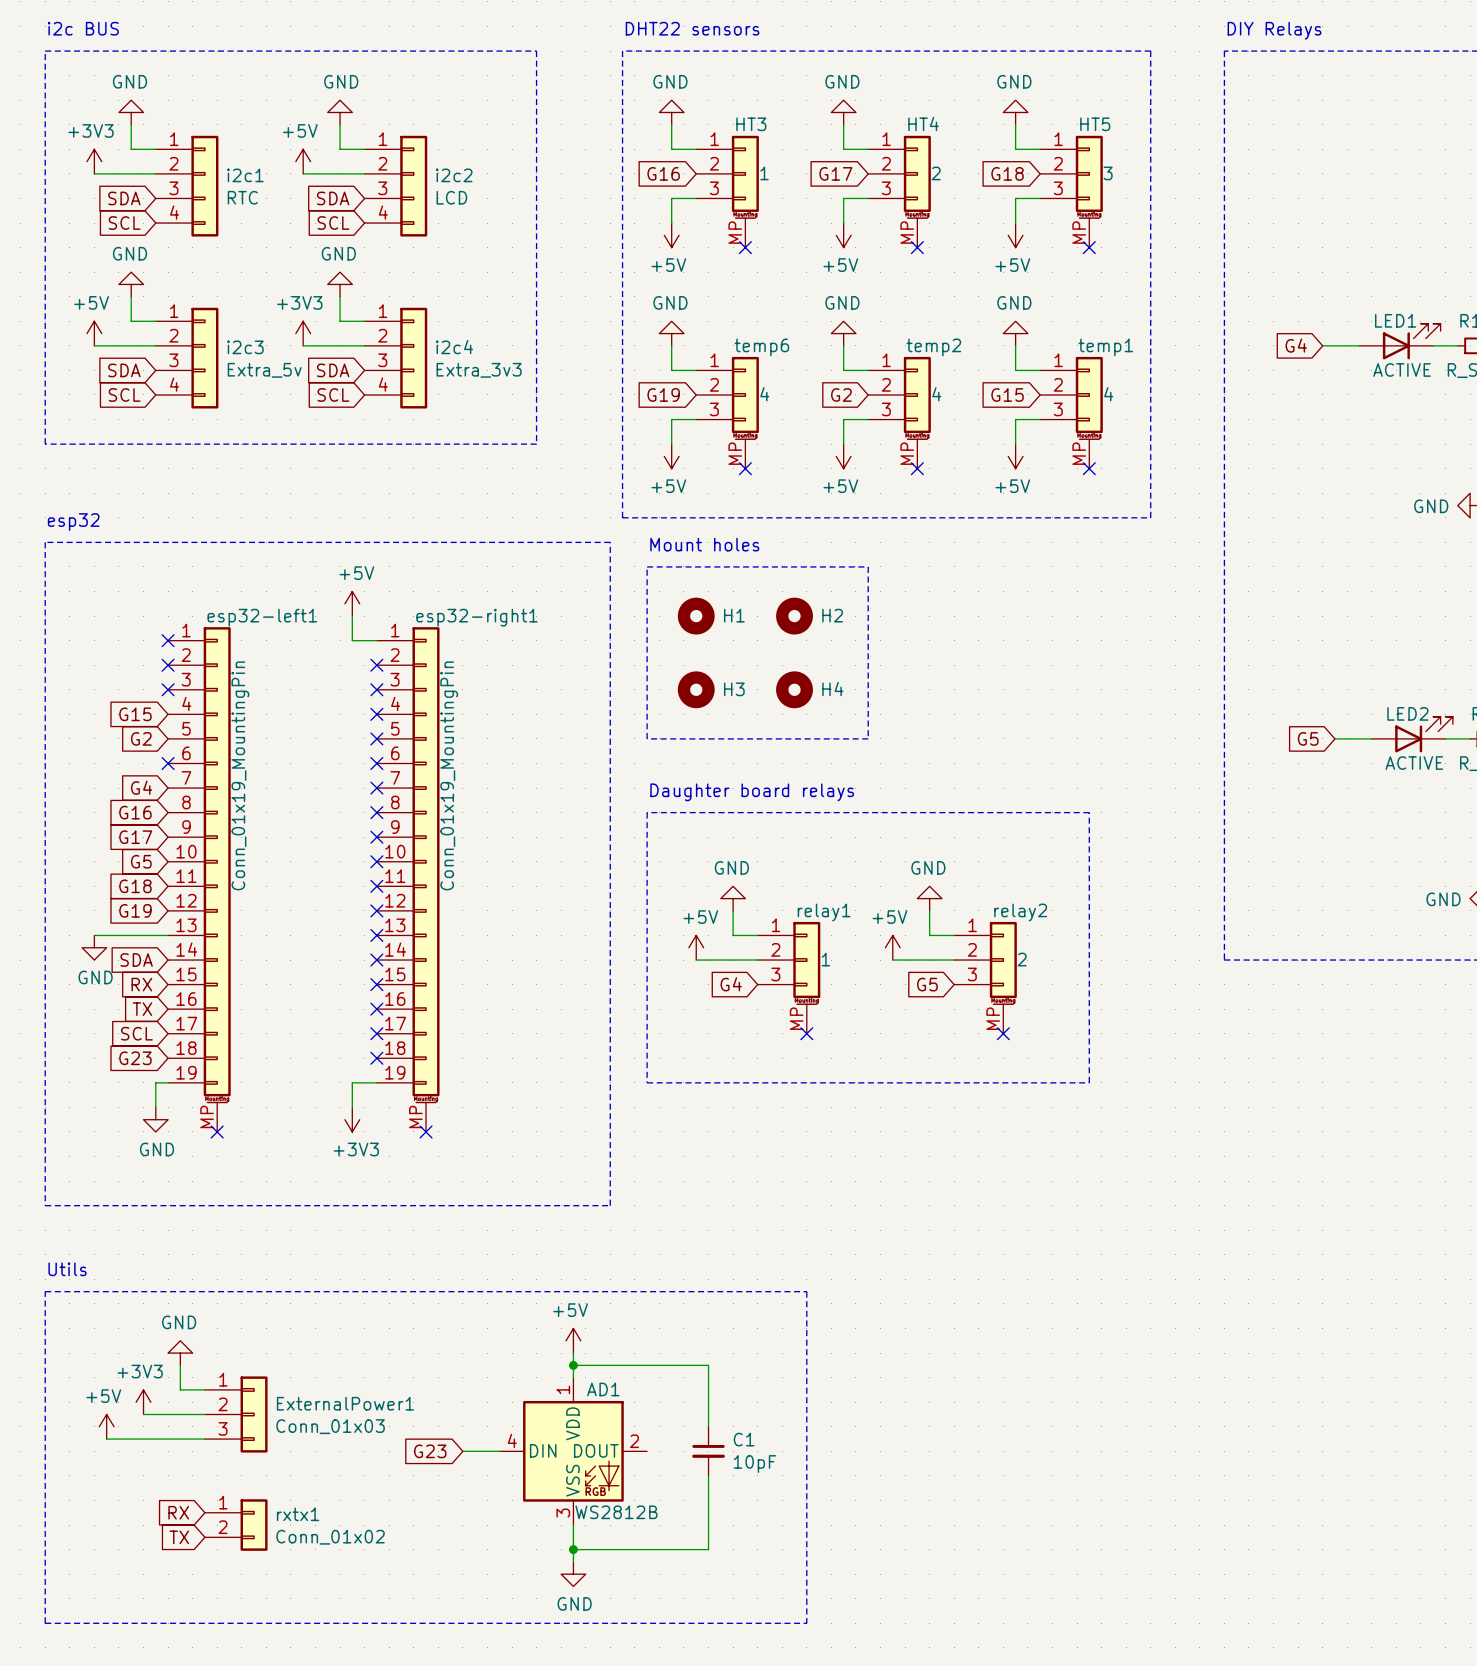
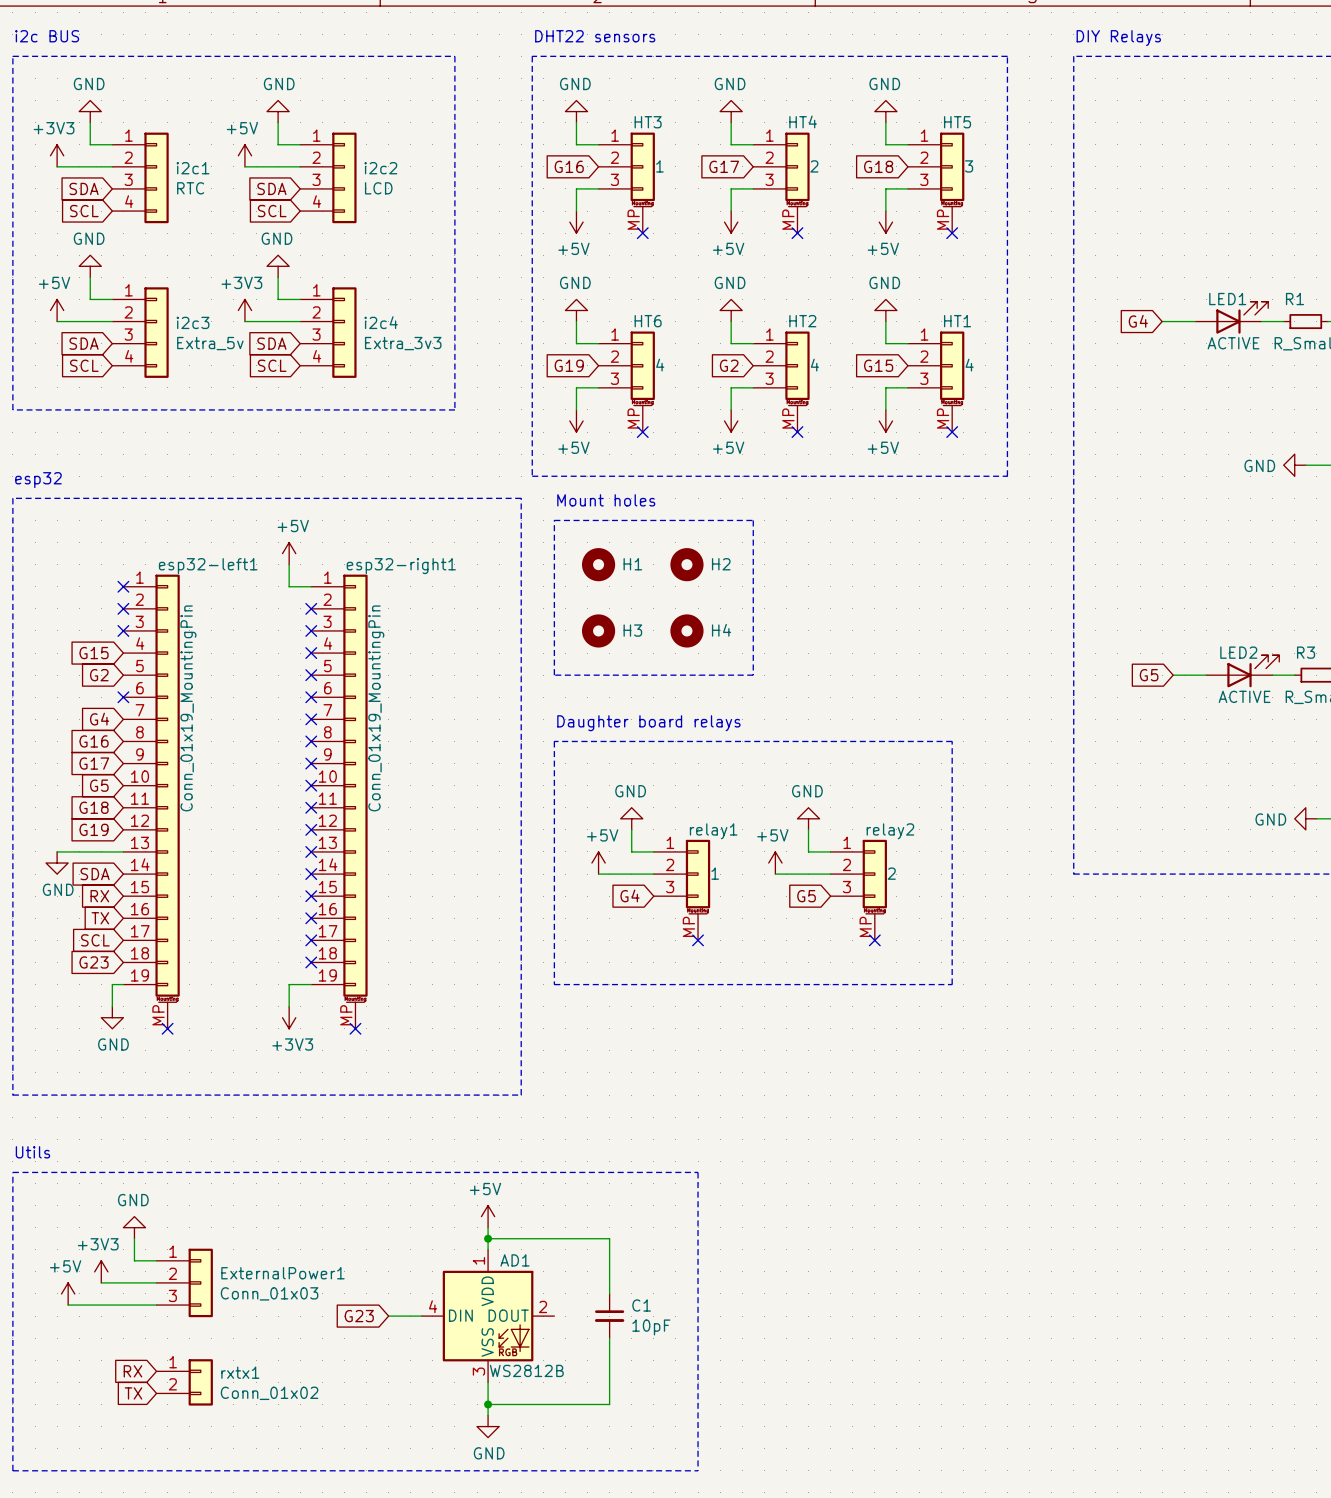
temp6 name: temp6 (761, 347) -> HT6 (648, 321)
temp2 name: temp2 (933, 347) -> HT2 (802, 321)
temp1 name: temp1 (1105, 347) -> HT1 (957, 321)

